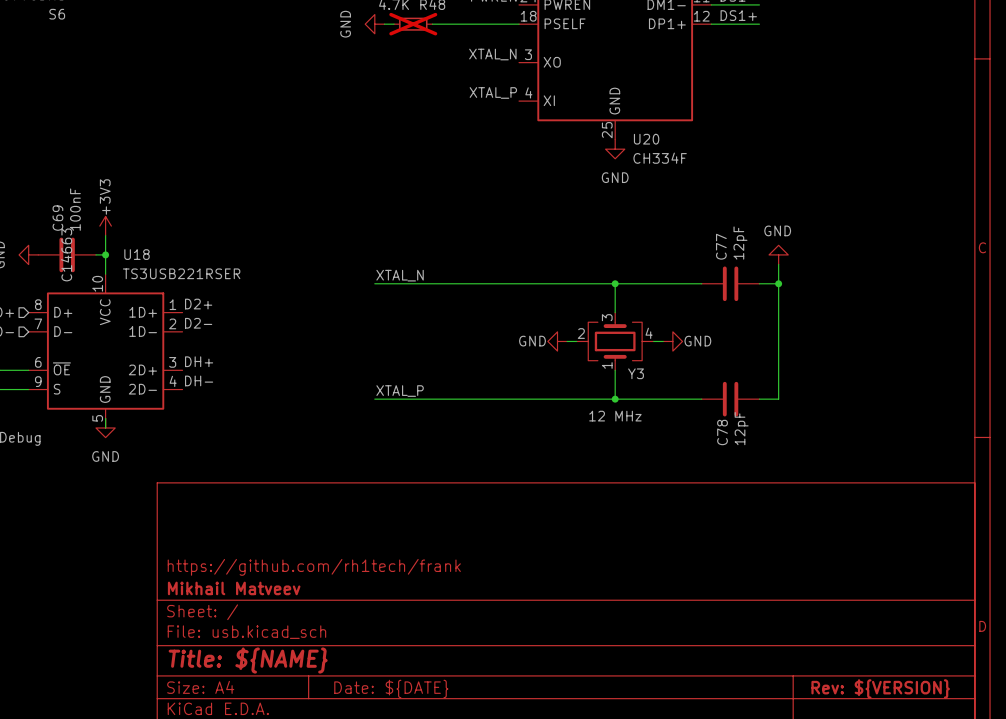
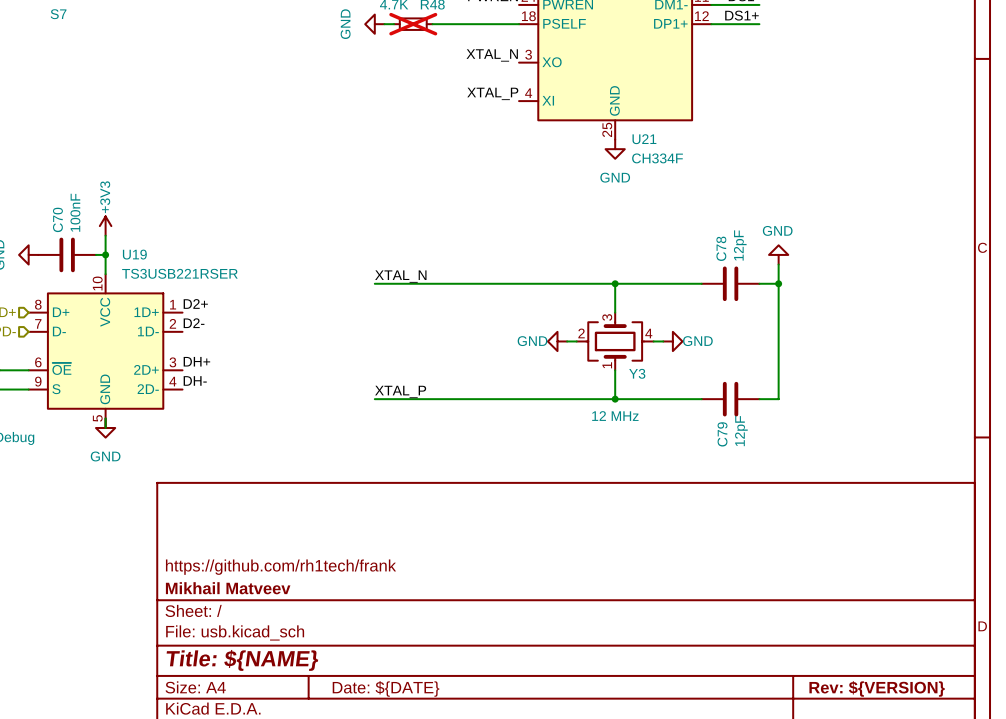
S6 name: S6 (57, 14) -> S7 (58, 14)
U20 name: U20 (646, 139) -> U21 (644, 139)
C69 name: C69 (57, 218) -> C70 (57, 219)
C77 name: C77 (721, 246) -> C78 (721, 248)
C69 text: C14663 (66, 254) -> none
U18 name: U18 (137, 254) -> U19 (134, 254)
C78 name: C78 (722, 432) -> C79 (722, 434)

